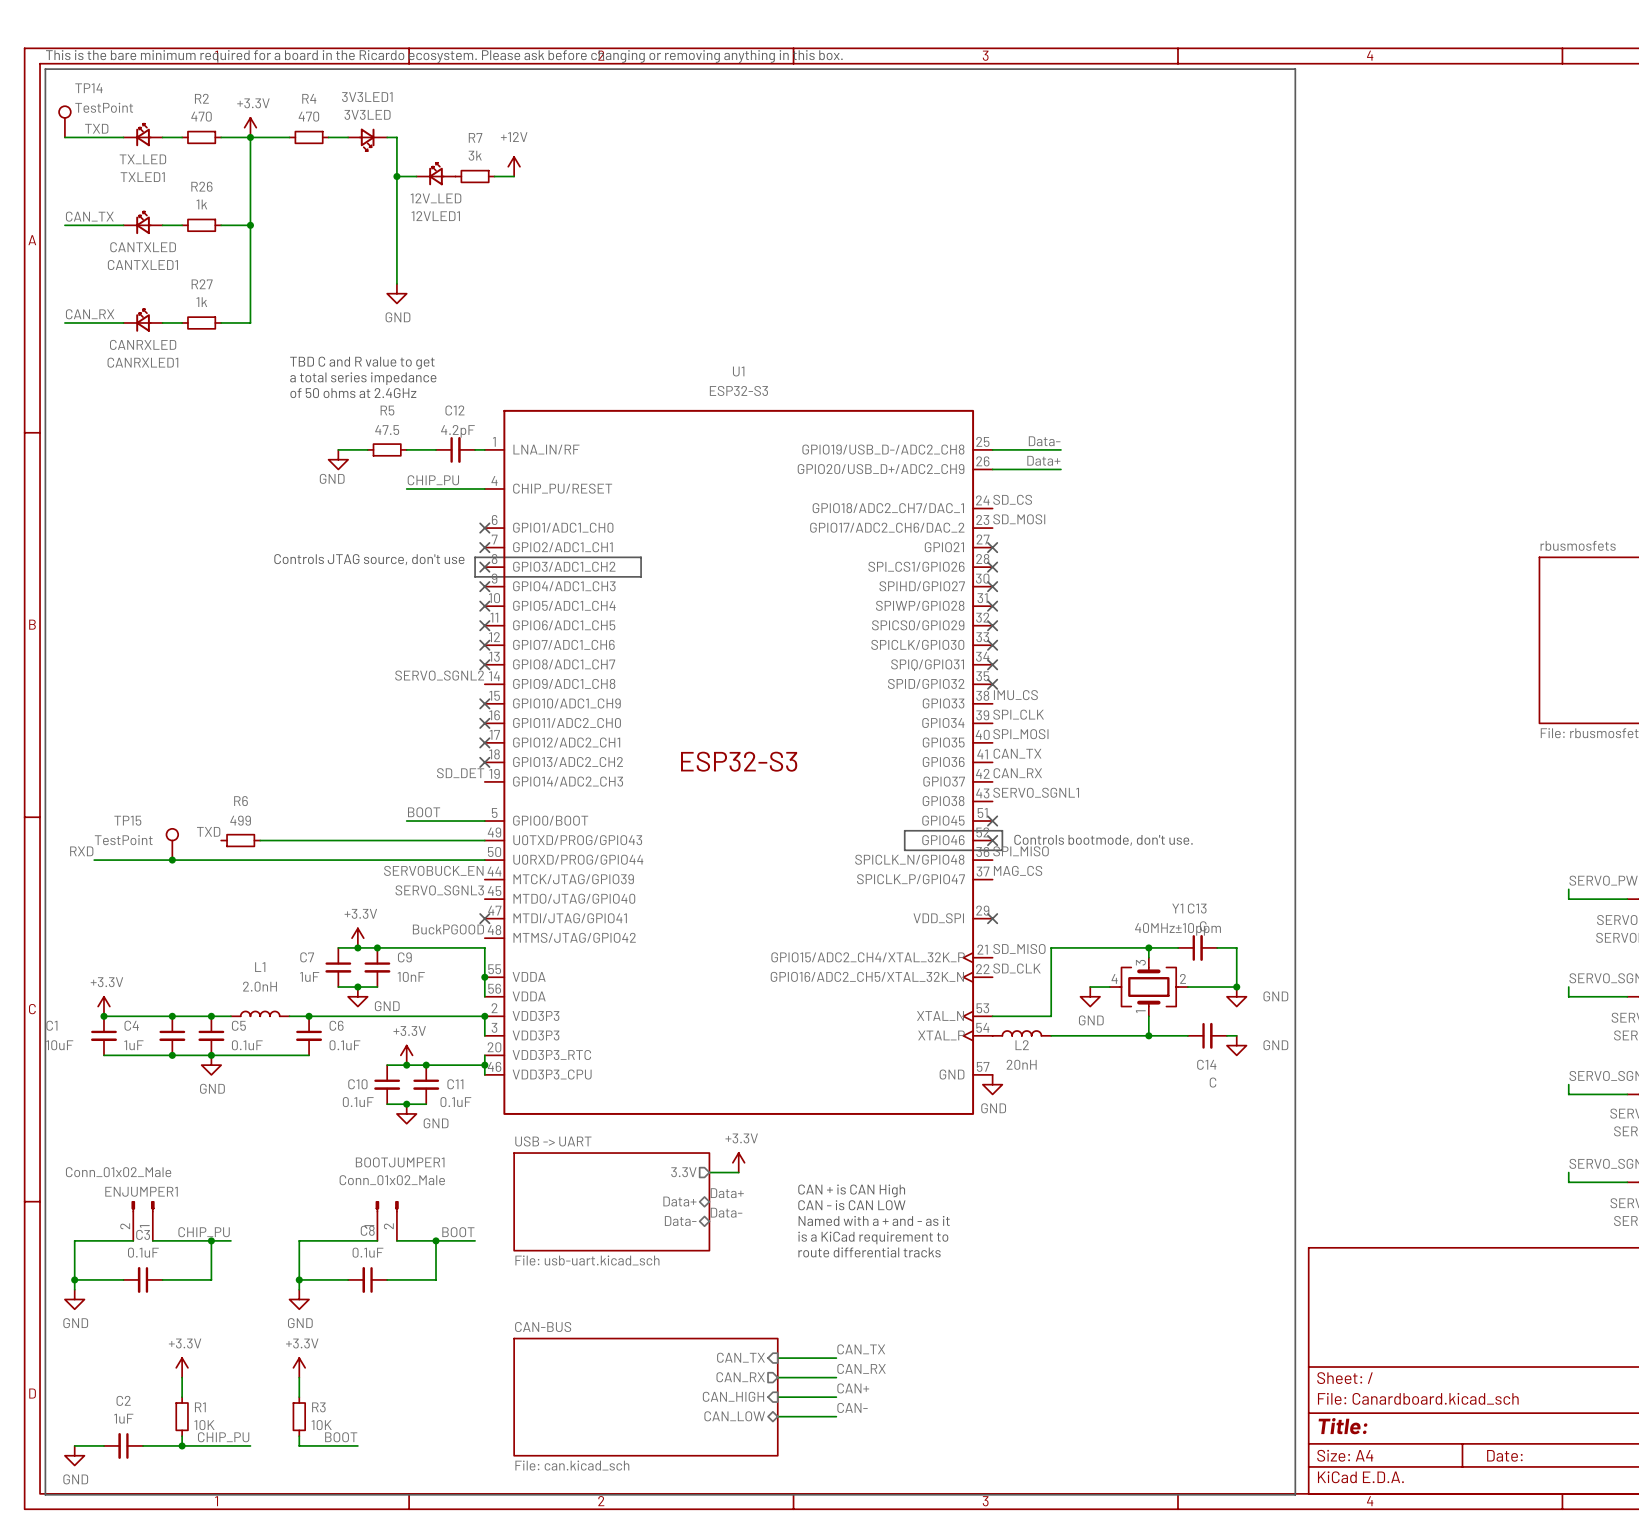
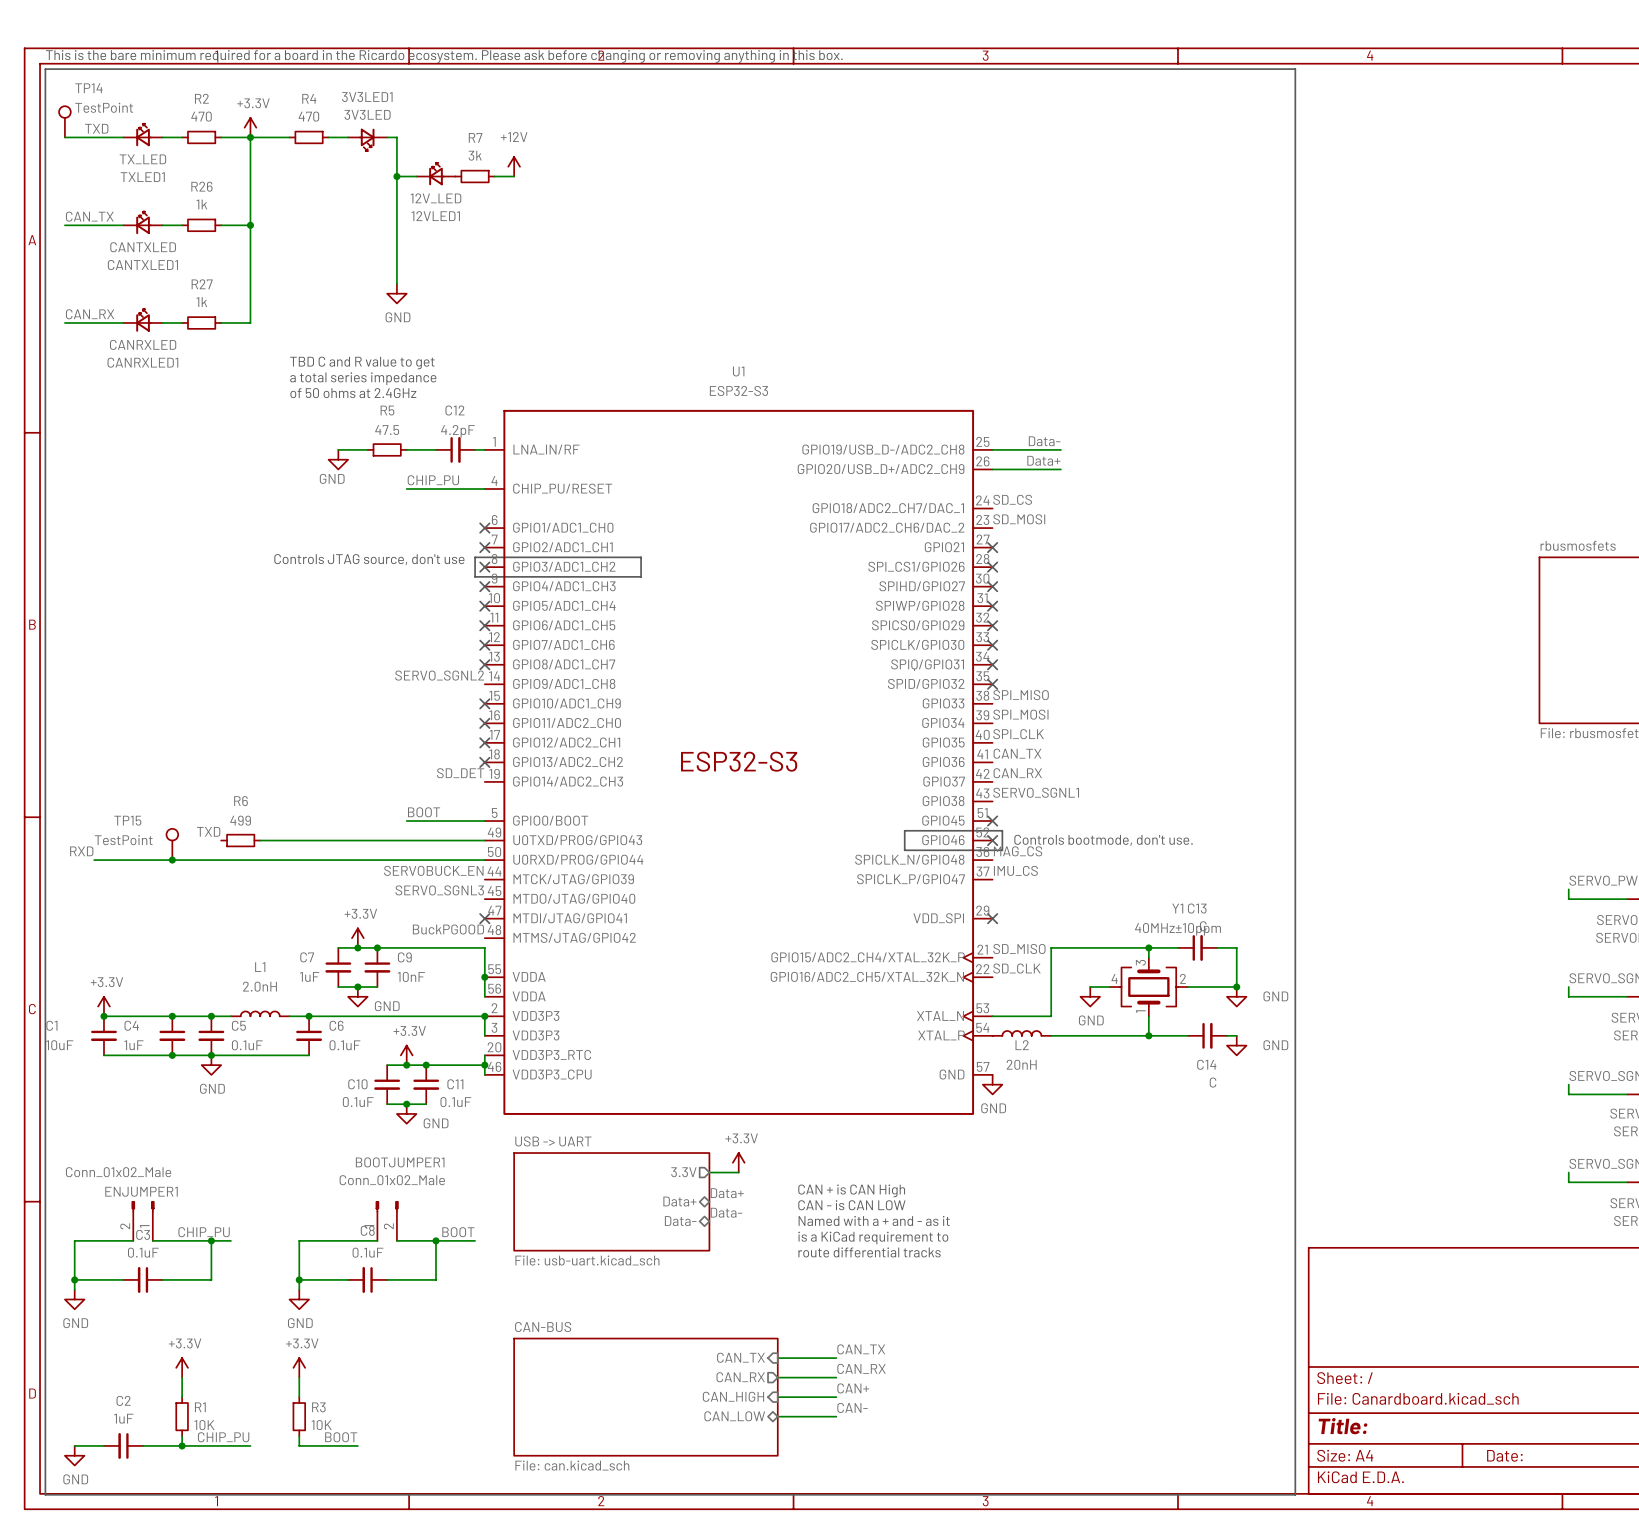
label: IMU_CS (1015, 695) -> SPI_MISO (1021, 695)
label: SPI_CLK (1018, 714) -> SPI_MOSI (1020, 714)
label: SPI_MOSI (1020, 734) -> SPI_CLK (1018, 734)
label: SPI_MISO (1021, 851) -> MAG_CS (1018, 851)
label: MAG_CS (1018, 870) -> IMU_CS (1015, 870)

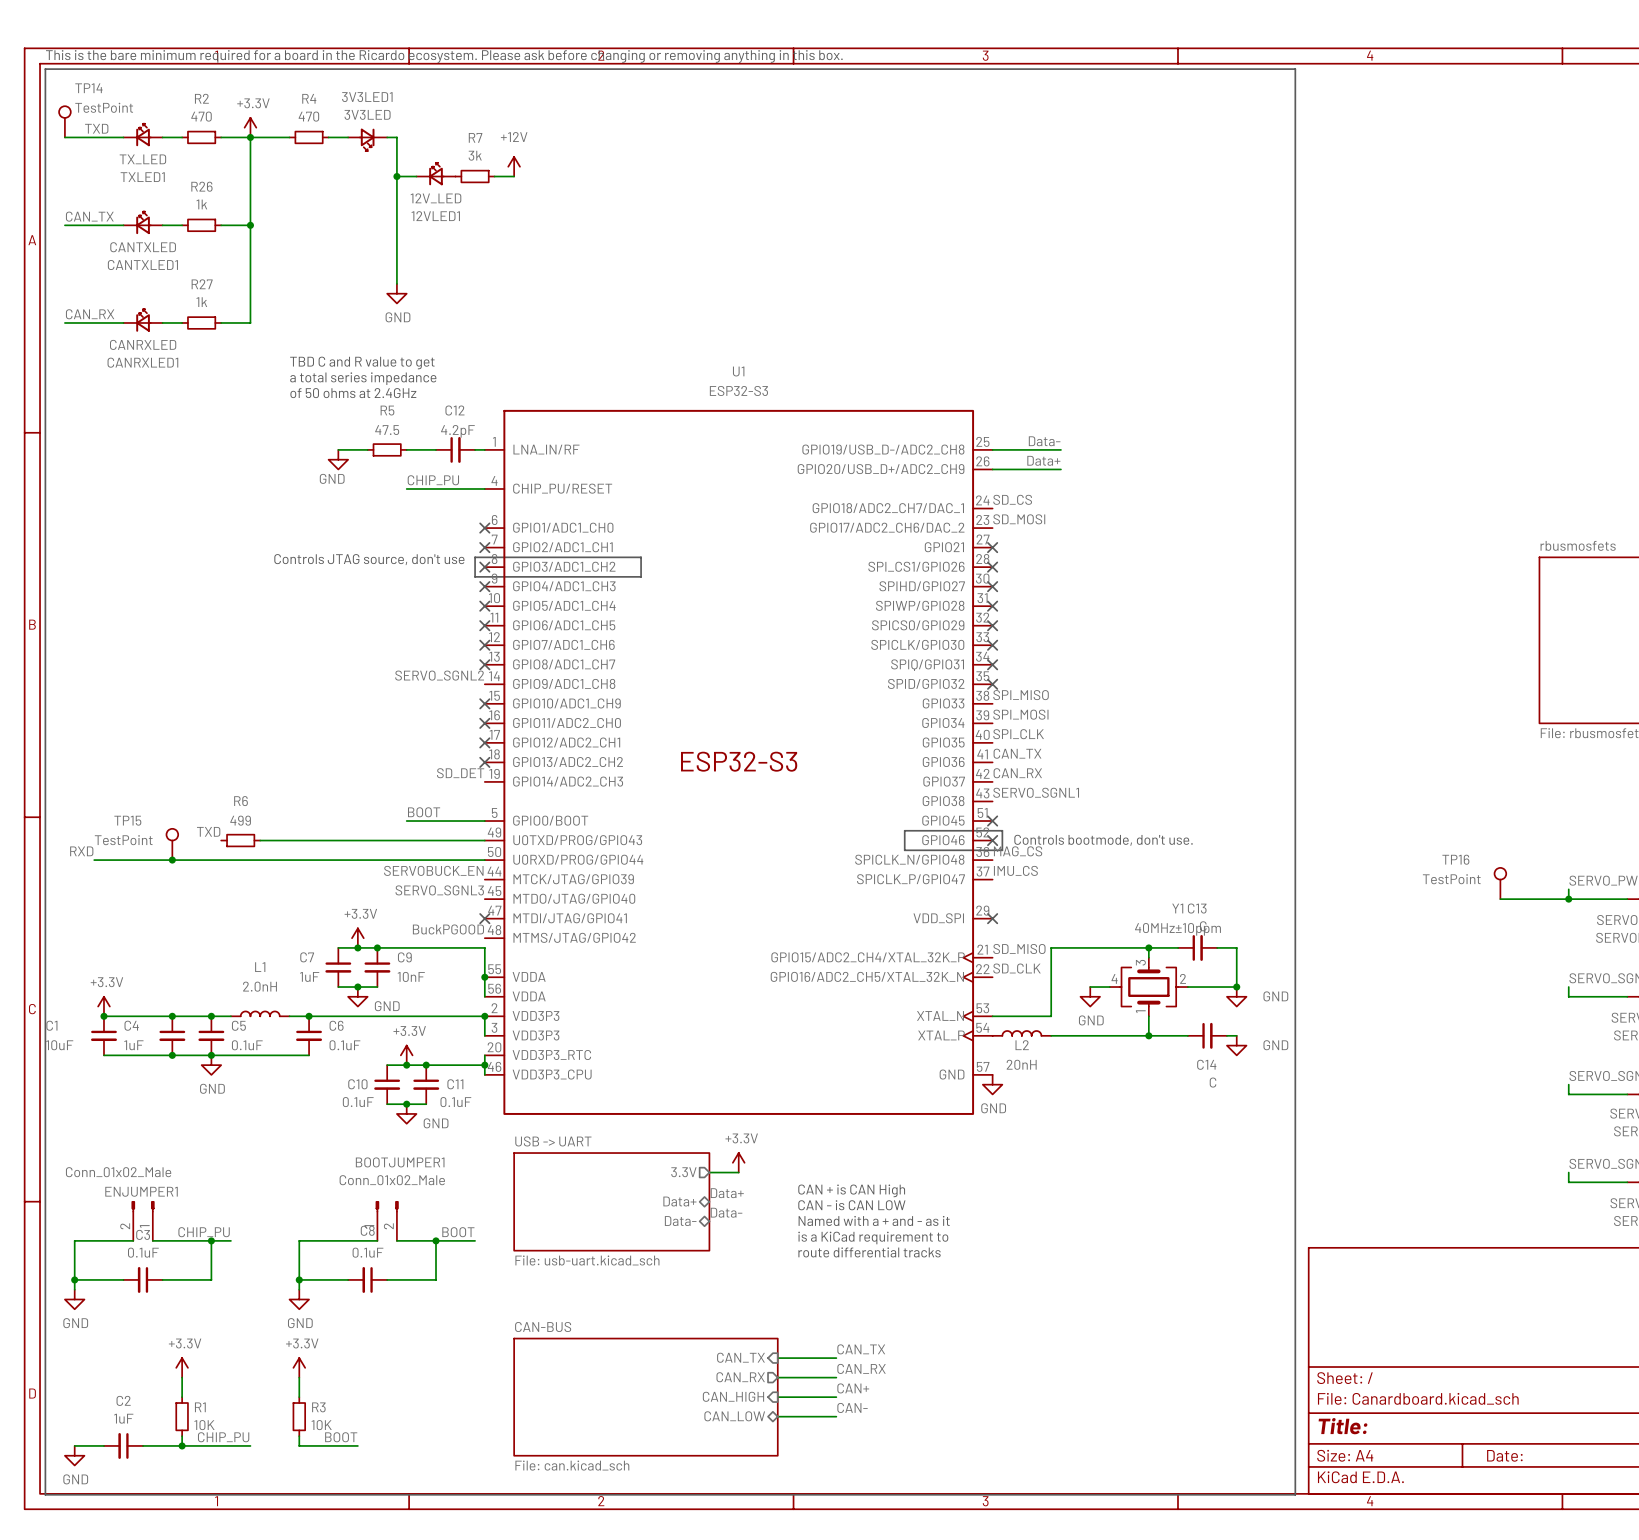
TP16: none -> TestPoint (1500, 883)
wire: none -> (1500, 899) (1568, 899)
junction: none -> (1568, 899)

